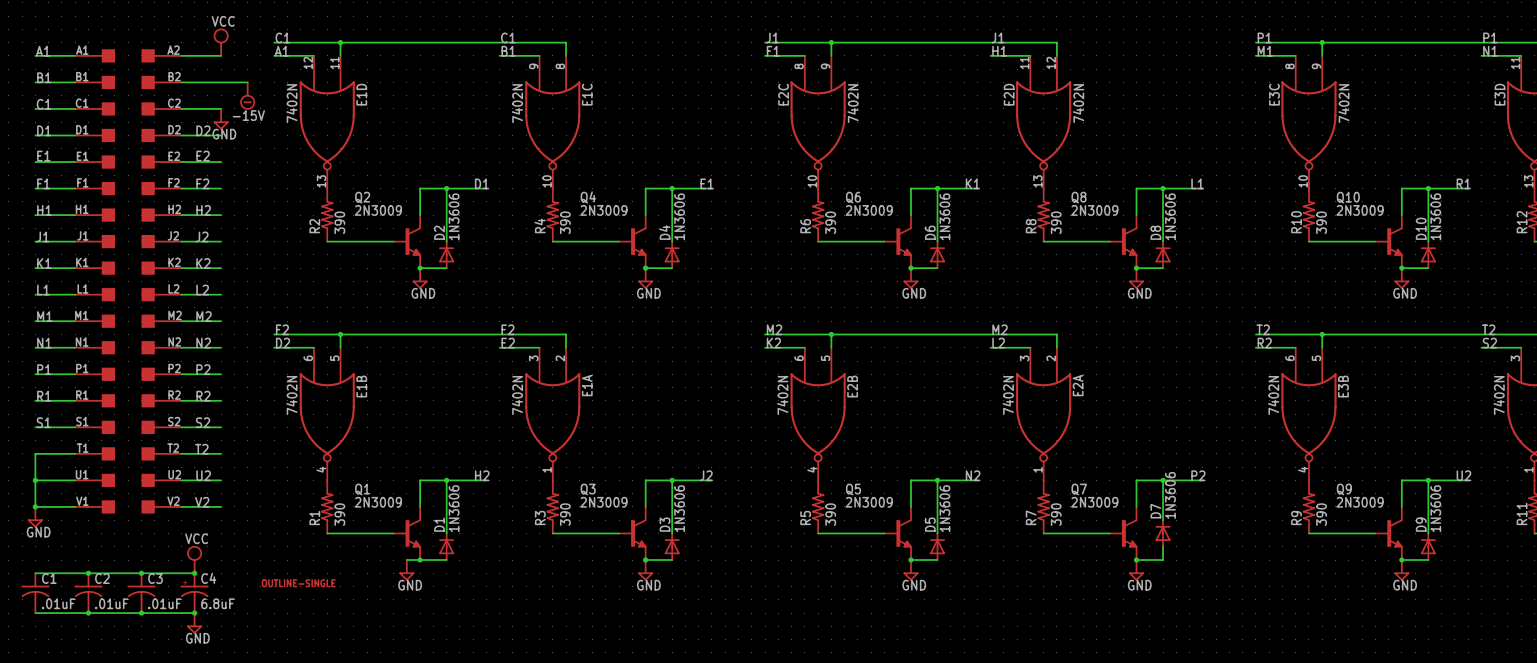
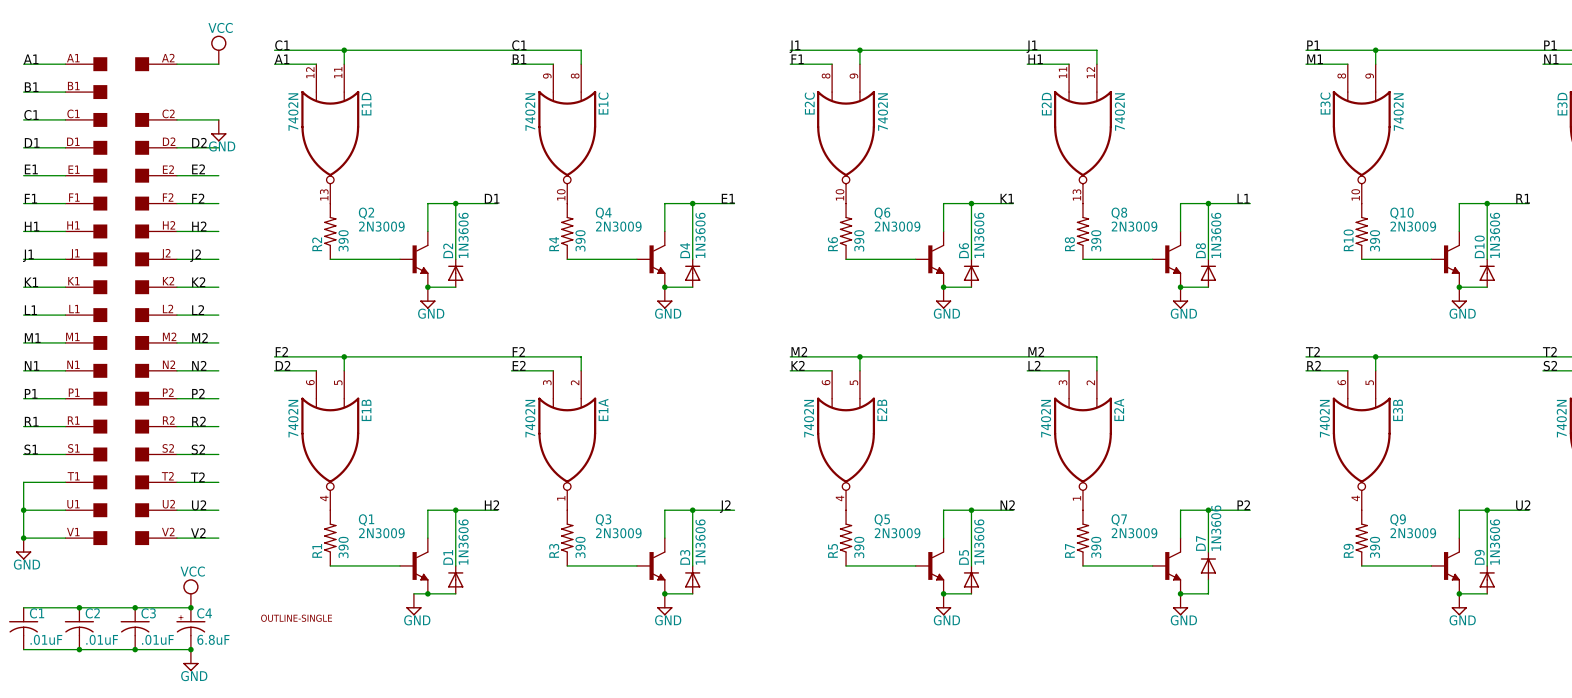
part: (161, 82) -> none
wire: (181, 82) (247, 82) -> none
power symbol: -15V (247, 96) -> none

